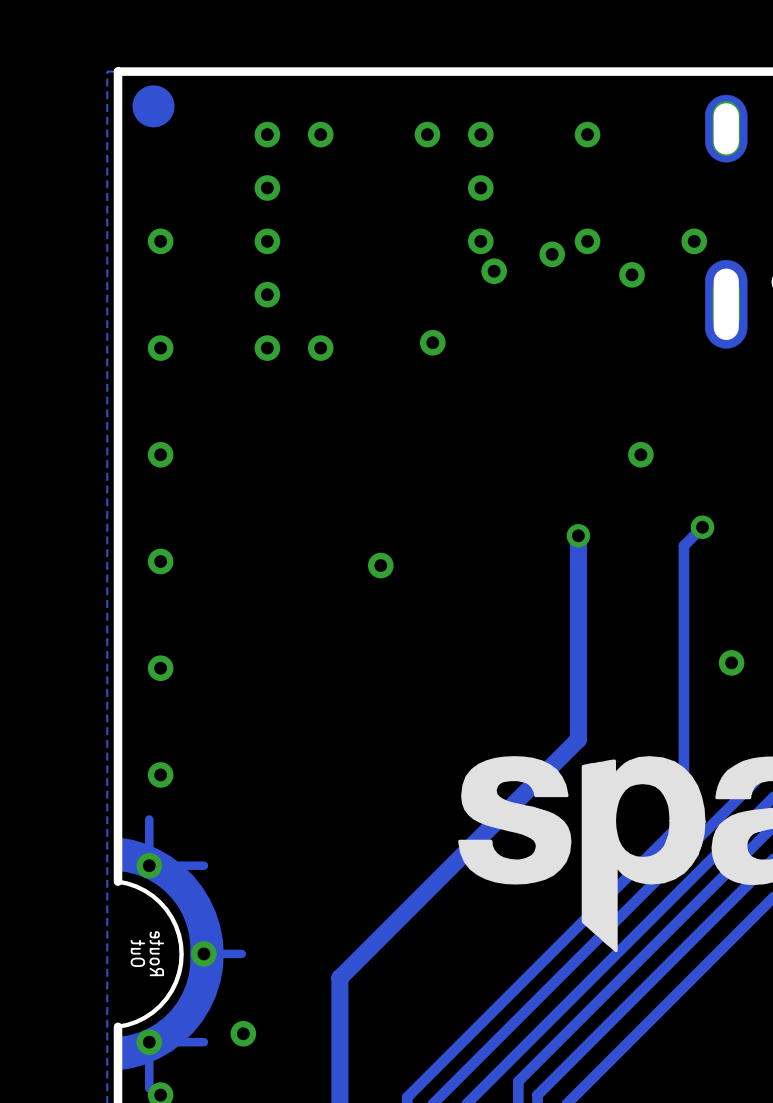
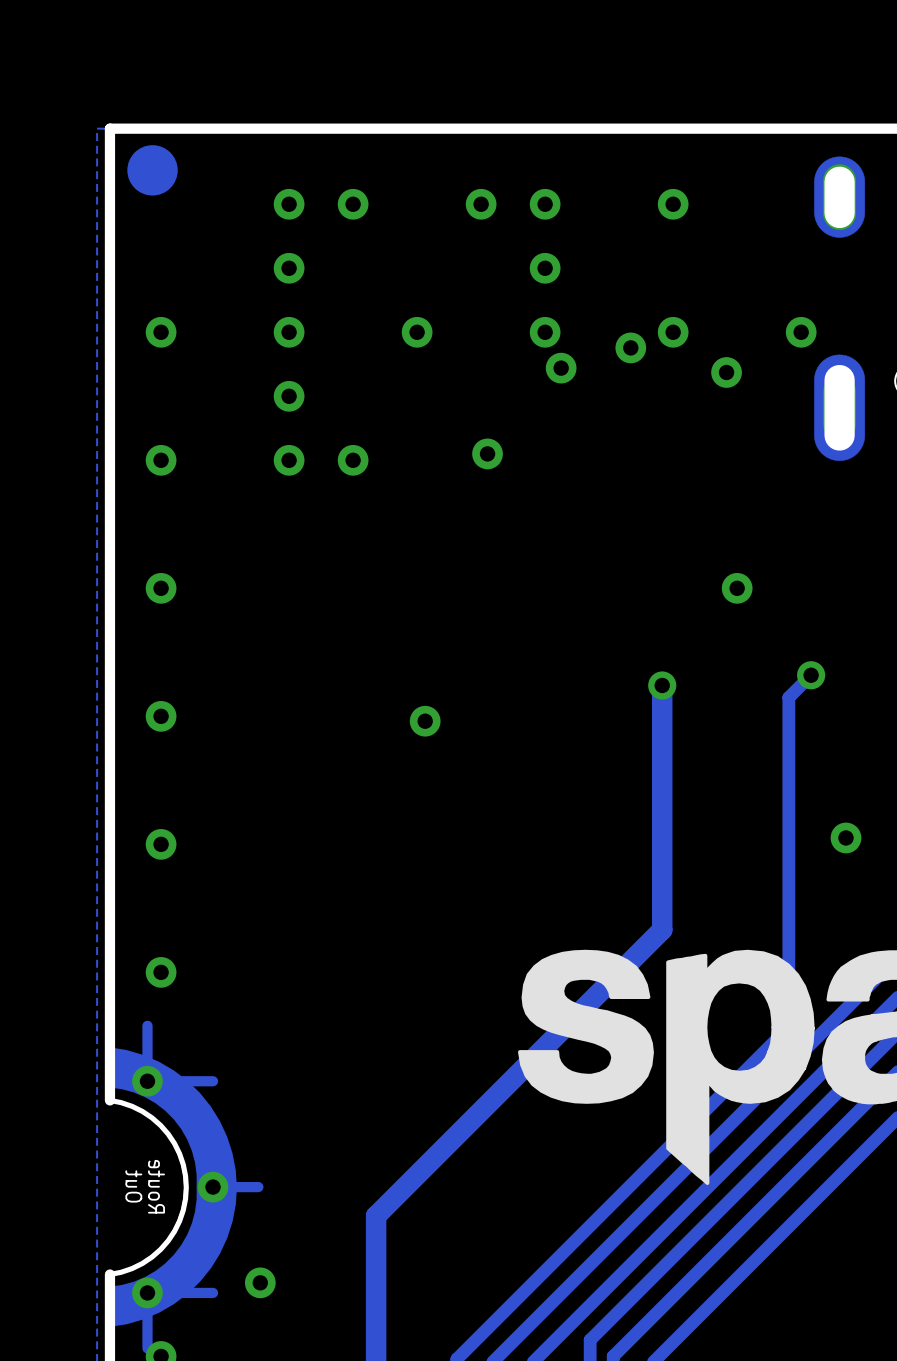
via: none -> (417, 332)

